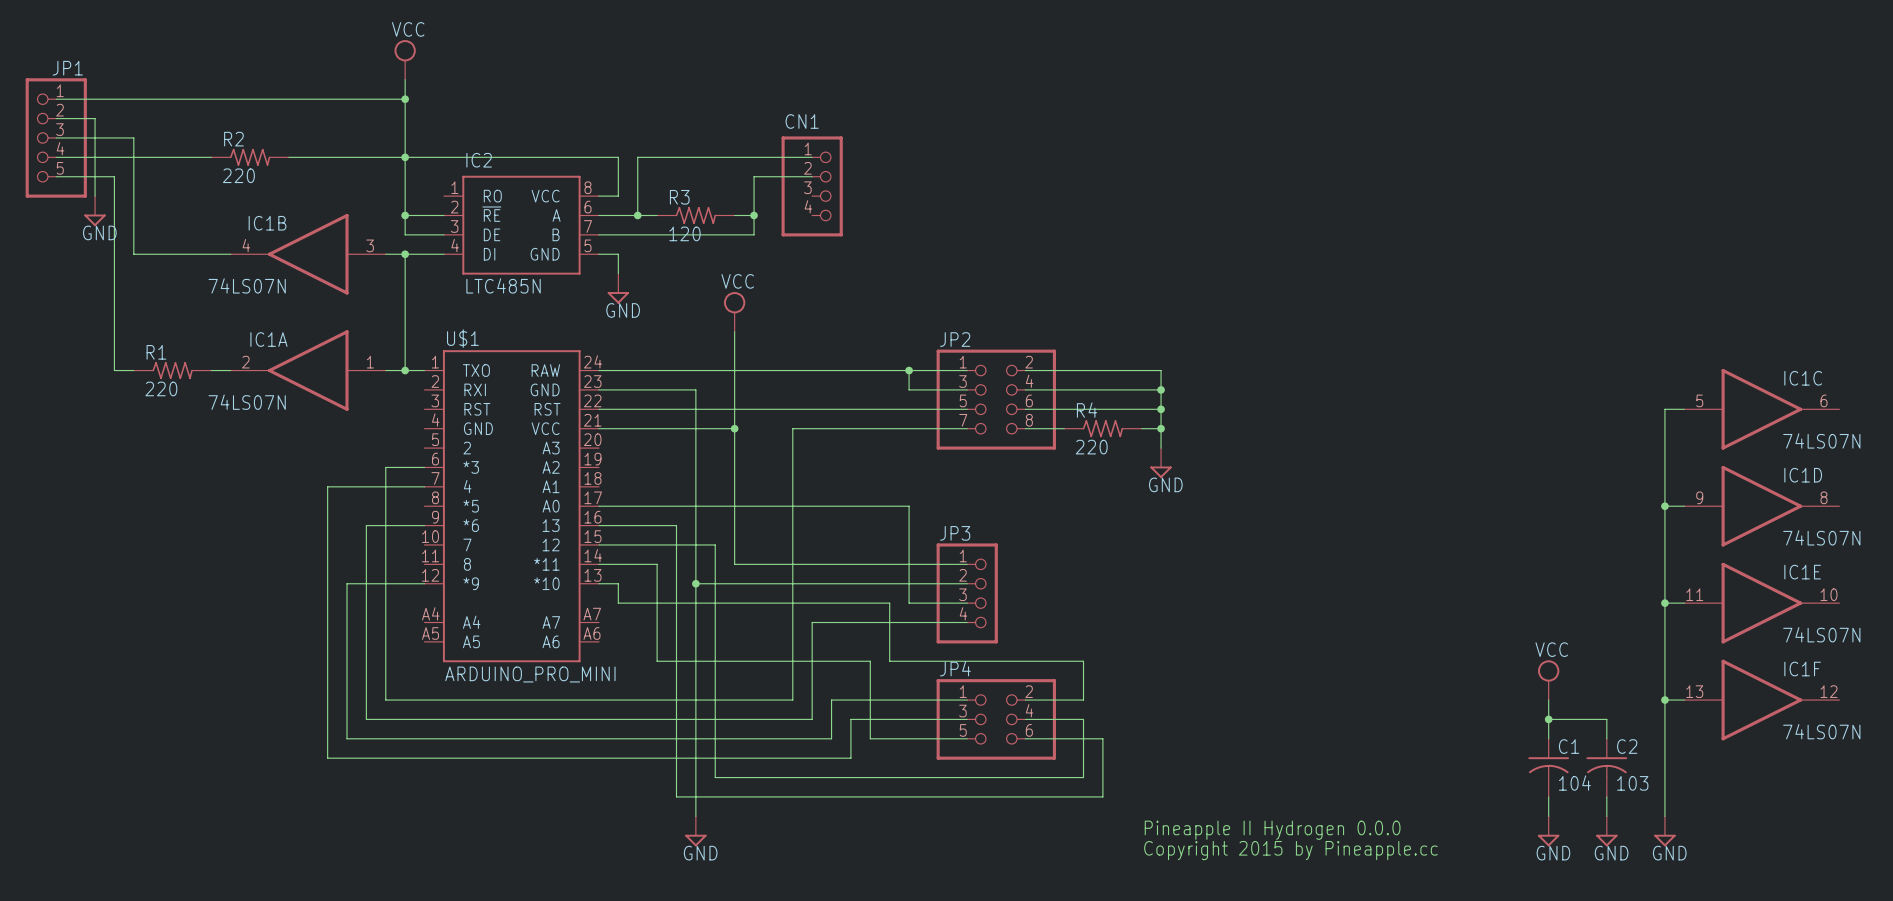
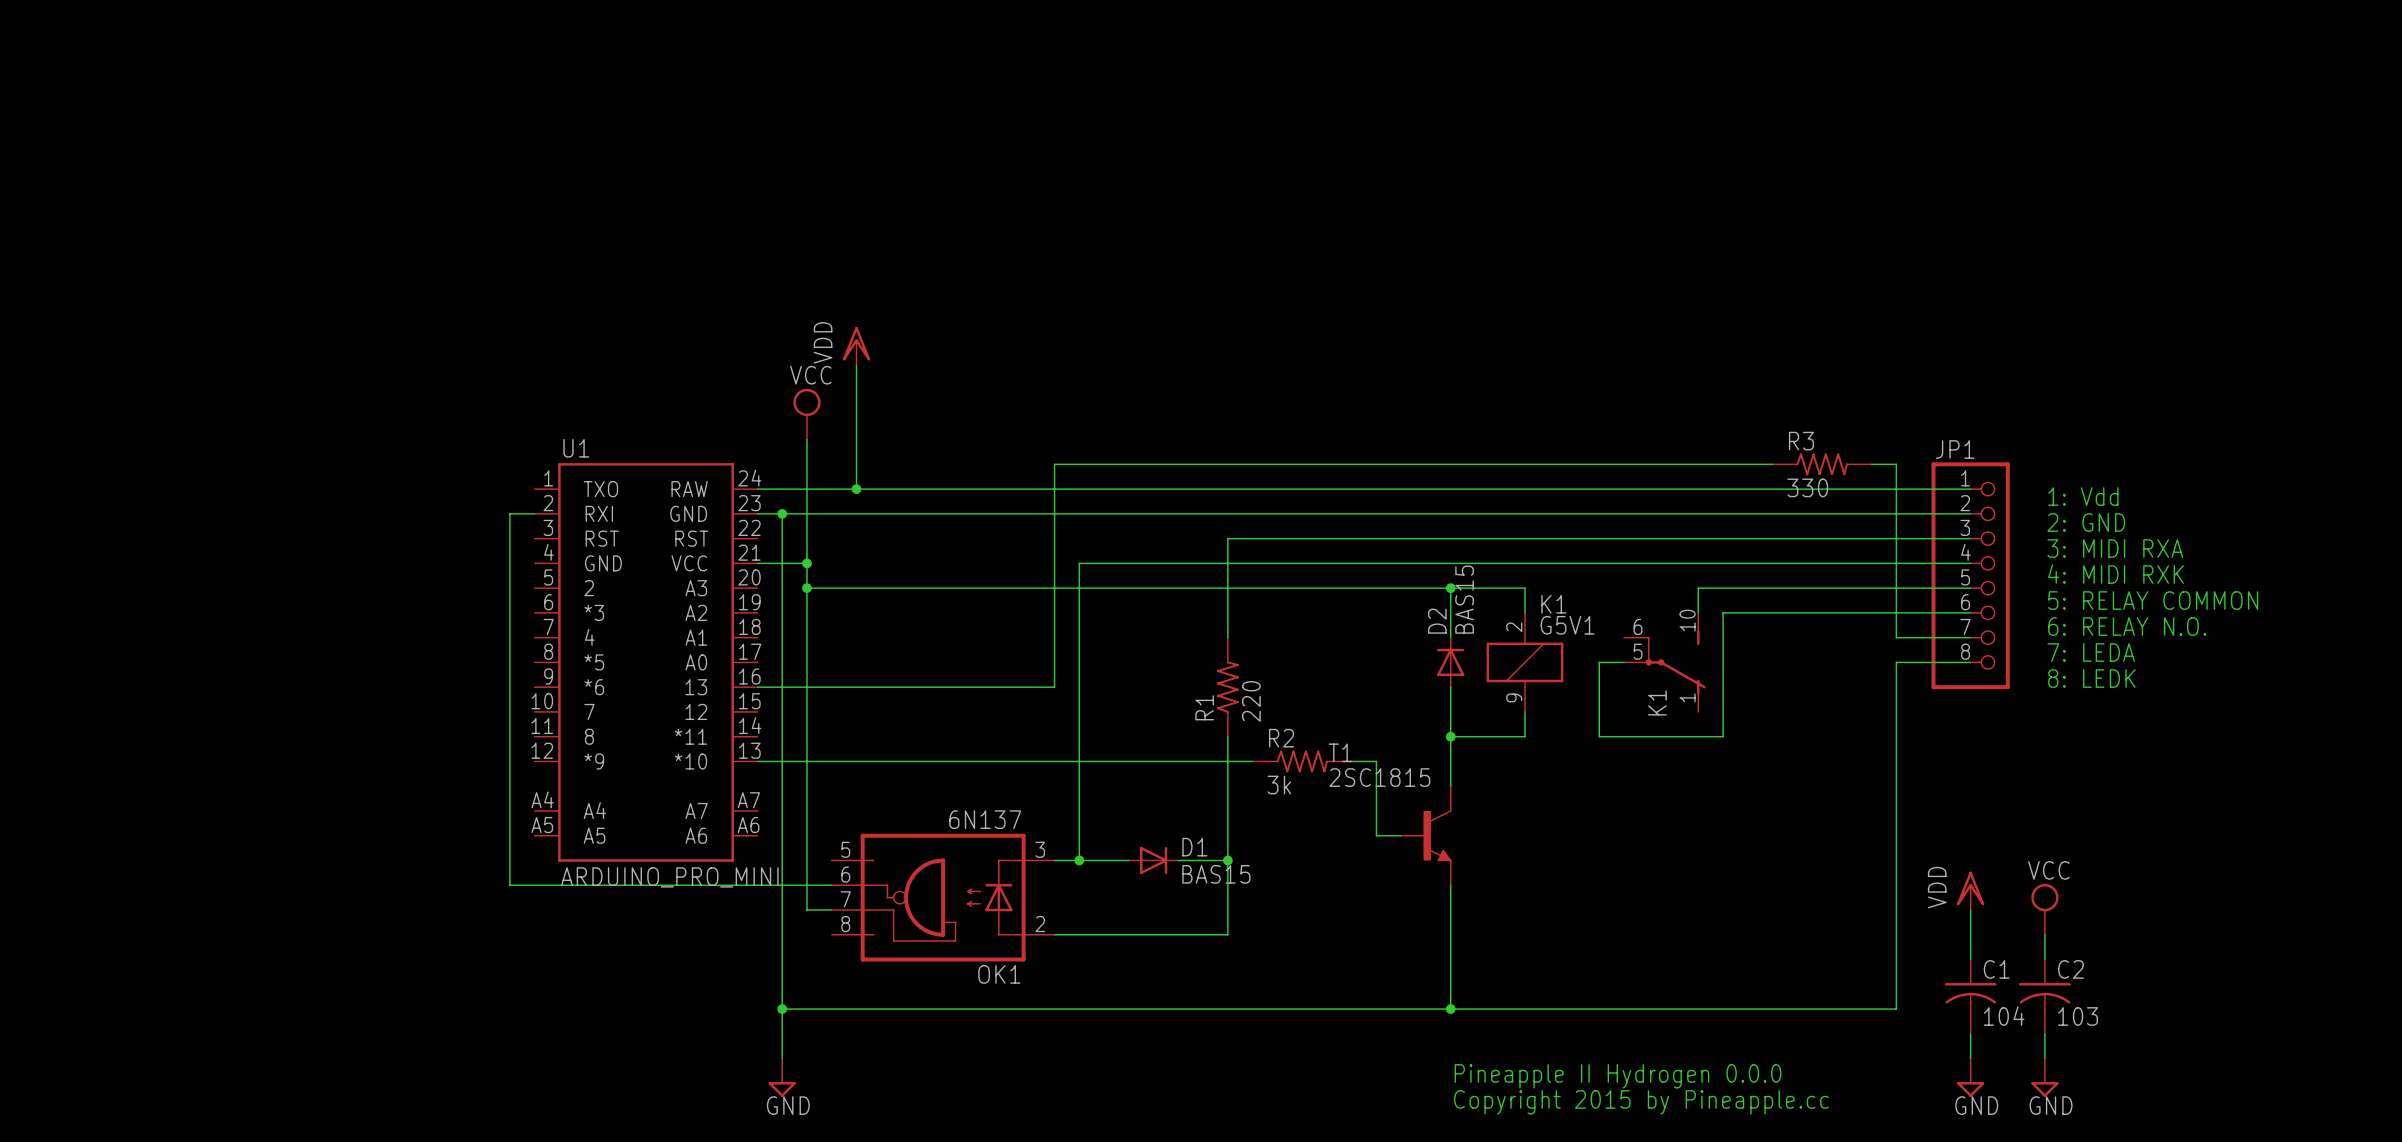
power symbol: VCC (405, 59) -> none
JP1 name position: JP1 (67, 68) -> JP1 (1955, 449)
JP1 symbol: [25, 78, 87, 198] -> [1931, 462, 2010, 690]
wire: (405, 79) (405, 234) (443, 234) -> none
wire: (56, 99) (405, 99) -> none
junction: (405, 99) -> none
wire: (56, 118) (95, 118) (95, 196) -> none
wire: (56, 137) (133, 137) (133, 254) (230, 254) -> none
wire: (56, 157) (211, 157) -> none
R2 position: (250, 157) -> (1302, 761)
wire: (288, 157) (618, 157) (618, 196) (598, 196) -> none
junction: (405, 157) -> none
wire: (812, 157) (637, 157) (637, 215) -> none
R2 value: 220 (238, 175) -> 3k (1279, 784)
wire: (56, 176) (114, 176) (114, 370) (133, 370) -> none
wire: (812, 176) (754, 176) (754, 234) (598, 234) -> none
CN1: (812, 186) -> none
power symbol: GND (95, 211) -> none
wire: (405, 215) (443, 215) -> none
junction: (405, 215) -> none
wire: (598, 215) (657, 215) -> none
junction: (637, 215) -> none
R3 position: (695, 215) -> (1822, 464)
wire: (734, 215) (754, 215) -> none
junction: (754, 215) -> none
IC2: LTC485N (521, 225) -> none
R3 value: 120 (684, 233) -> 330 (1807, 487)
IC1B: 74LS07N (308, 254) -> none
wire: (385, 254) (443, 254) -> none
wire: (405, 254) (405, 370) -> none
junction: (405, 254) -> none
wire: (598, 254) (618, 254) (618, 273) -> none
power symbol: none -> VDD (856, 346)
wire: none -> (856, 365) (856, 489)
power symbol: GND (618, 288) -> none
power symbol position: VCC (734, 311) -> VCC (806, 414)
wire: (734, 331) (734, 564) (967, 564) -> (1227, 934) (1227, 736)
U$1 name: U$1 (462, 338) -> U1 (576, 448)
wire: none -> (1871, 464) (1896, 464) (1896, 637) (1970, 637)
R1 rotation: 0° (172, 370) -> 90° counterclockwise (1227, 687)
R1 position: (172, 370) -> (1227, 687)
wire: (211, 370) (230, 370) -> none
IC1A: 74LS07N (308, 370) -> none
wire: (385, 370) (424, 370) -> none
junction: (405, 370) -> none
junction: none -> (856, 489)
wire: (909, 370) (909, 389) -> (881, 513) (1153, 513)
junction: (909, 370) -> none
wire: none -> (1227, 489) (1302, 489)
wire: (1161, 370) (1161, 448) -> (1475, 489) (1970, 489)
text: none -> 1: Vdd (2083, 496)
wire: none -> (534, 513) (509, 513) (509, 885) (831, 885)
wire: none -> (782, 513) (782, 761) (881, 761)
junction: none -> (782, 513)
wire: (695, 389) (695, 816) -> none
wire: none -> (1227, 513) (1302, 513)
wire: none -> (1475, 513) (1970, 513)
junction: (1161, 389) -> none
text: none -> 2: GND (2086, 522)
JP2: (996, 399) -> none
wire: (598, 409) (967, 409) -> none
wire: none -> (1302, 538) (1227, 538) (1227, 637)
wire: none -> (1475, 538) (1970, 538)
junction: (1161, 409) -> none
wire: (1684, 409) (1664, 409) (1664, 816) -> none
IC1C: 74LS07N (1761, 409) -> none
text: none -> 3: MIDI RXA (2115, 548)
wire: (637, 428) (734, 428) -> none
junction: none -> (806, 563)
junction: (734, 428) -> none
wire: (850, 428) (792, 428) (792, 700) (657, 700) -> (1079, 563) (1079, 860)
wire: none -> (1227, 563) (1302, 563)
R4: 220 (1102, 428) -> none
wire: none -> (1475, 563) (1970, 563)
junction: (1161, 428) -> none
text: none -> 4: MIDI RXK (2116, 574)
wire: none -> (806, 588) (1524, 588) (1524, 612)
junction: none -> (806, 588)
wire: none -> (1450, 588) (1450, 637)
junction: none -> (1450, 588)
wire: none -> (1970, 588) (1698, 588) (1698, 612)
text: none -> 5: RELAY COMMON (2153, 600)
power symbol: GND (1161, 463) -> none
wire: (424, 467) (385, 467) (385, 700) (637, 700) -> (806, 439) (806, 910)
wire: none -> (1970, 612) (1723, 612) (1723, 736) (1599, 736) (1599, 662) (1624, 662)
text: none -> 6: RELAY N.O. (2127, 626)
wire: (424, 486) (327, 486) (327, 758) (850, 758) (850, 719) -> (1054, 934) (1079, 934)
text: none -> 7: LEDA (2091, 652)
wire: (598, 506) (909, 506) (909, 603) (967, 603) -> none
D2: none -> BAS15 (1450, 662)
K1: none -> G5V1 (1524, 662)
K1: none -> (1664, 662)
wire: (1664, 506) (1684, 506) -> none
junction: (1664, 506) -> none
IC1D: 74LS07N (1761, 506) -> none
text: none -> 8: LEDK (2091, 678)
wire: (424, 525) (366, 525) (366, 719) (812, 719) (812, 622) (967, 622) -> none
wire: (676, 525) (676, 796) (1102, 796) (1102, 738) (1025, 738) -> (856, 687) (1054, 687) (1054, 464) (1772, 464)
wire: none -> (1450, 687) (1450, 786)
wire: (598, 544) (715, 544) (715, 777) -> (782, 1009) (906, 1009)
wire: none -> (1524, 711) (1524, 736) (1450, 736)
wire: (598, 564) (657, 564) (657, 661) (831, 661) -> none
junction: none -> (1450, 736)
wire: (424, 583) (347, 583) (347, 738) (831, 738) (831, 700) (967, 700) -> none
junction: (695, 583) -> none
wire: none -> (1227, 761) (1252, 761)
wire: none -> (1351, 761) (1376, 761) (1376, 835) (1401, 835)
JP3: (967, 593) -> none
wire: (618, 603) (889, 603) (889, 661) (928, 661) -> (782, 786) (782, 1058)
wire: (1664, 603) (1684, 603) -> none
junction: (1664, 603) -> none
IC1E: 74LS07N (1761, 603) -> none
T1: none -> 2SC1815 (1426, 835)
junction: none -> (1079, 860)
wire: (870, 661) (870, 738) (967, 738) -> (1104, 860) (1128, 860)
D1: none -> BAS15 (1153, 860)
wire: (967, 661) (1083, 661) (1083, 700) (1025, 700) -> none
junction: none -> (1227, 860)
wire: none -> (1450, 885) (1450, 1009)
power symbol: VCC (1548, 680) -> VDD (1970, 890)
OK1: none -> 6N137 (943, 897)
power symbol: none -> VCC (2044, 909)
wire: (1664, 700) (1684, 700) -> none
junction: (1664, 700) -> none
IC1F: 74LS07N (1761, 700) -> none
JP4: (996, 719) -> none
wire: (1025, 719) (1083, 719) (1083, 777) -> (1970, 662) (1896, 662) (1896, 1009) (1376, 1009)
wire: (1548, 719) (1606, 719) -> none
junction: (1548, 719) -> none
junction: none -> (782, 1009)
junction: none -> (1450, 1009)
power symbol position: GND (695, 831) -> GND (782, 1077)
power symbol: GND (1664, 831) -> none

